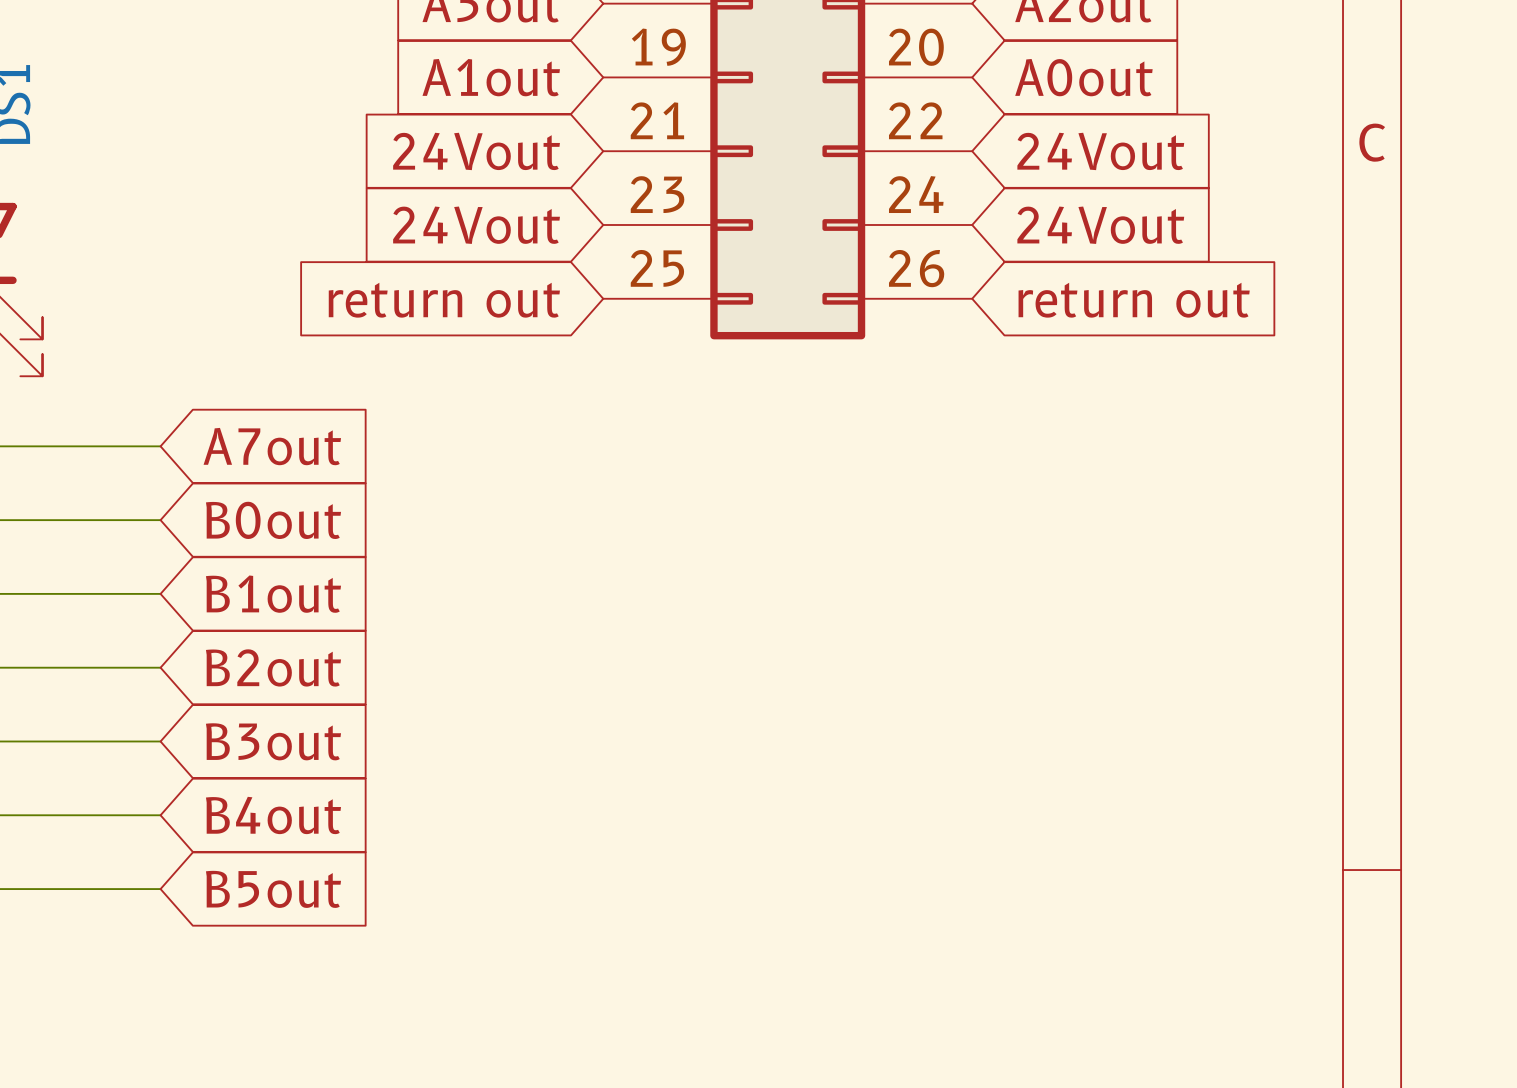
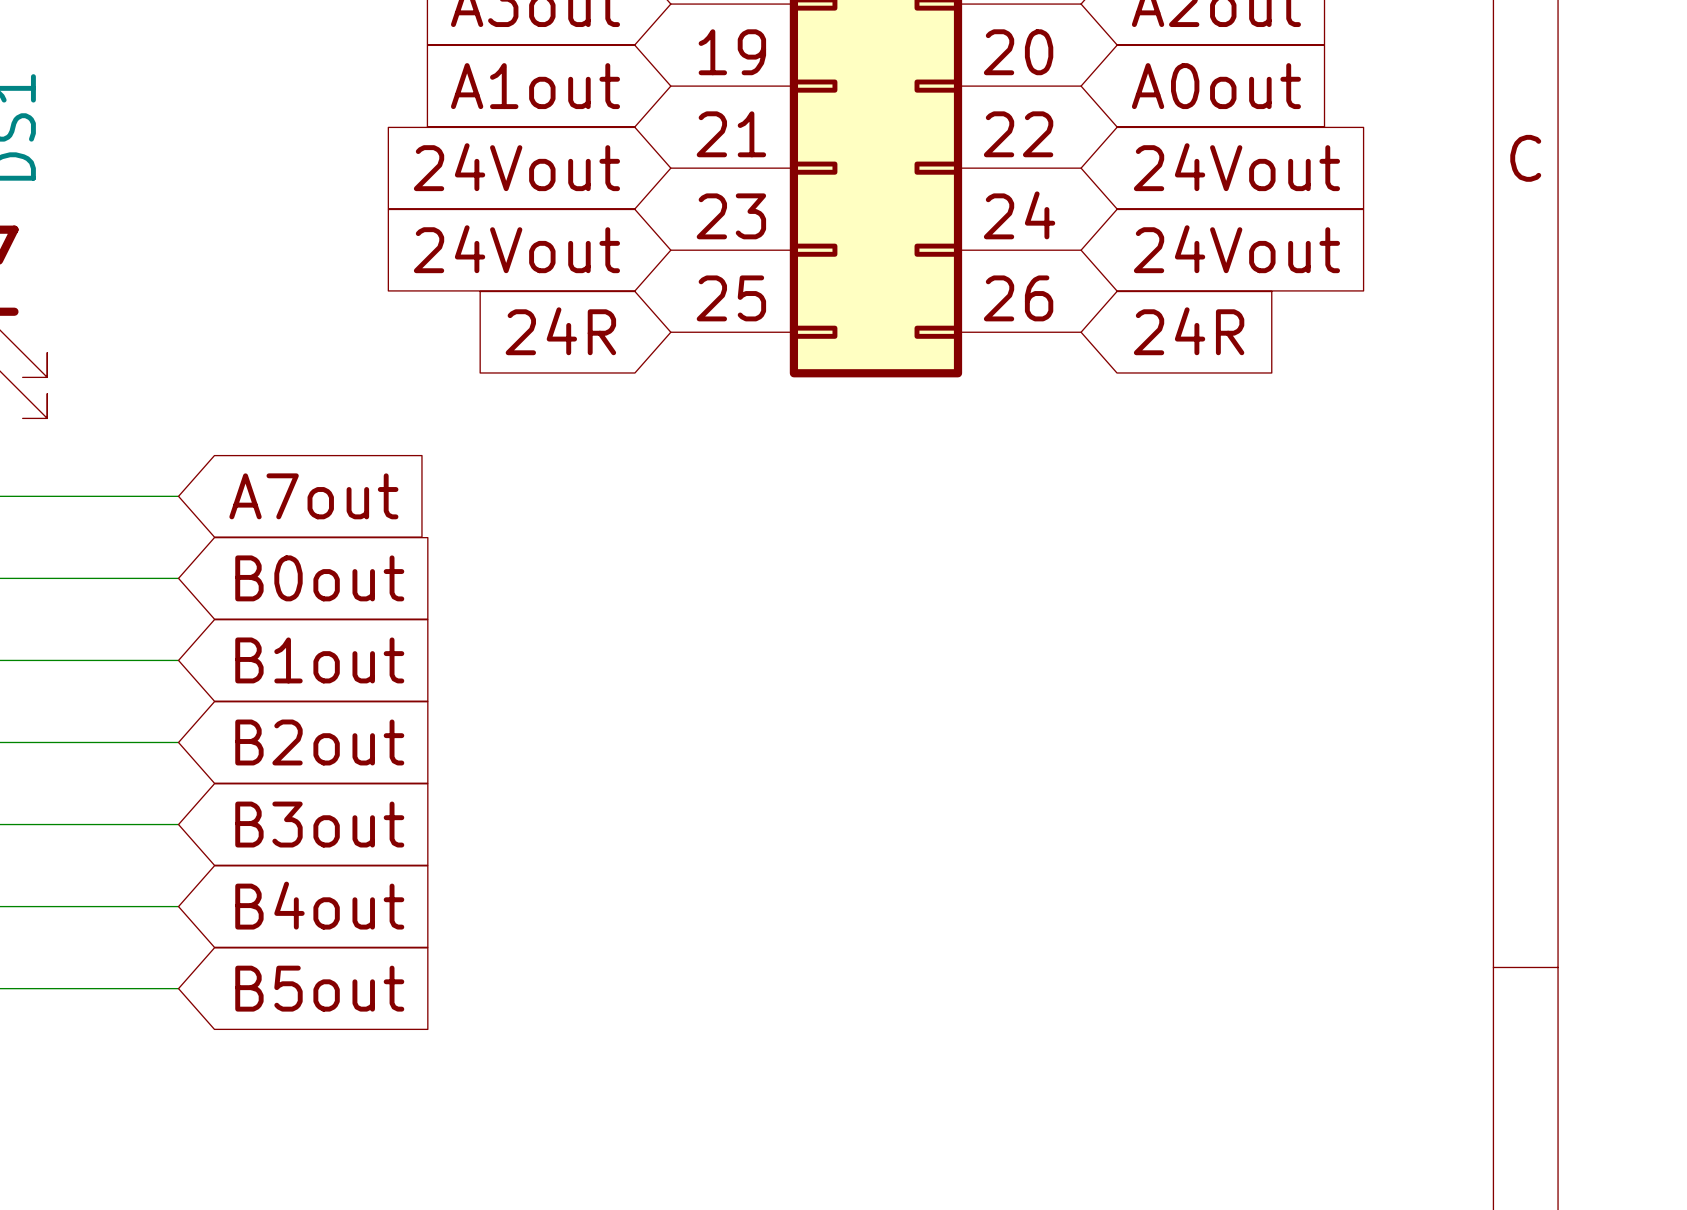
global label: return out (444, 300) -> 24R (560, 331)
global label: return out (1134, 300) -> 24R (1189, 331)

